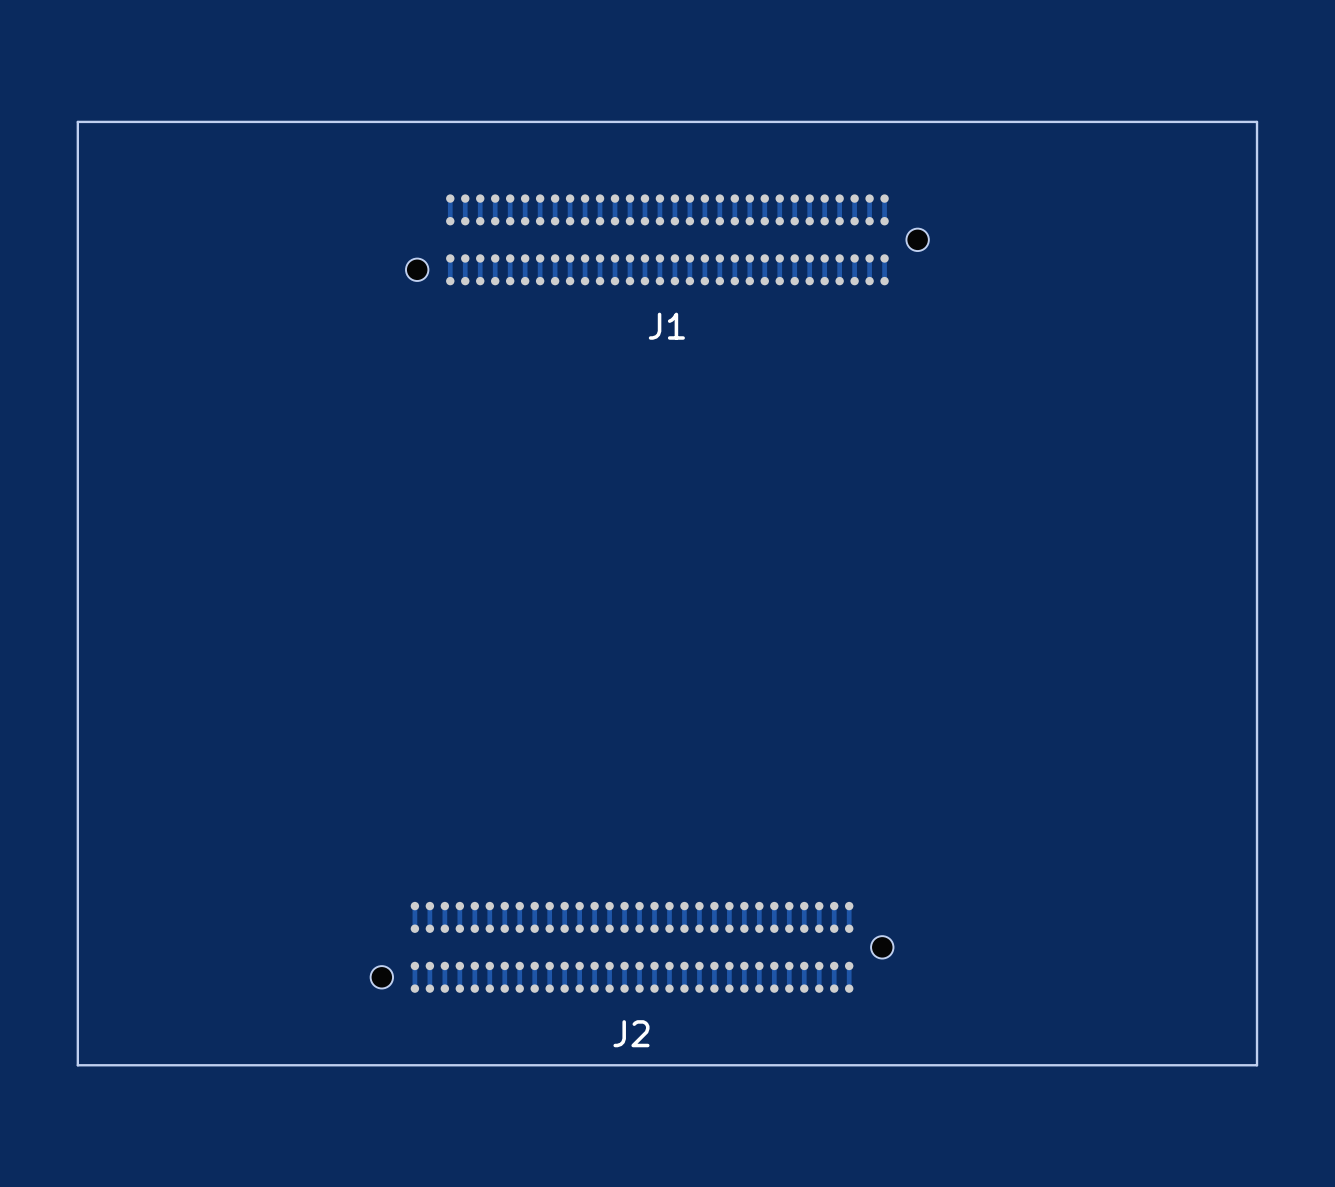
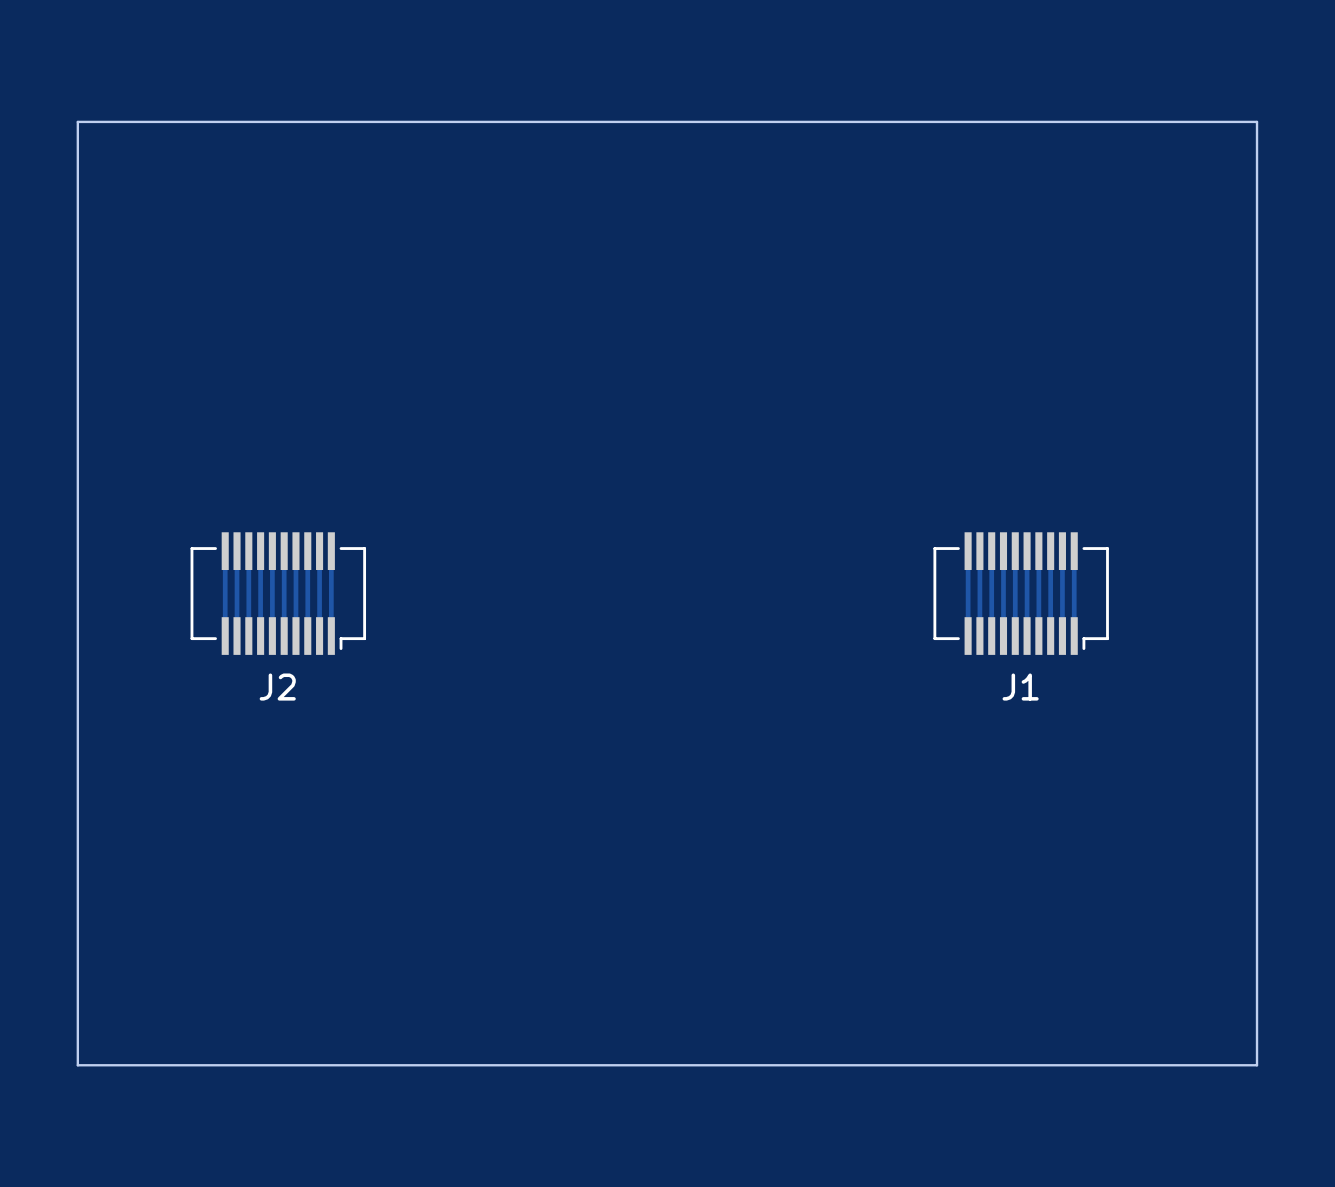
J1 footprint: [405, 194, 929, 286] -> [933, 532, 1109, 655]
track: (450, 198) (450, 221) -> none
track: (465, 198) (465, 221) -> none
track: (480, 198) (480, 221) -> none
track: (495, 198) (495, 221) -> none
track: (510, 198) (510, 221) -> none
track: (525, 198) (525, 221) -> none
track: (540, 198) (540, 221) -> none
track: (555, 198) (555, 221) -> none
track: (570, 198) (570, 221) -> none
track: (585, 198) (585, 221) -> none
track: (600, 198) (600, 221) -> none
track: (615, 198) (615, 221) -> none
track: (629, 198) (629, 221) -> none
track: (644, 198) (644, 221) -> none
track: (659, 198) (659, 221) -> none
track: (674, 198) (674, 221) -> none
track: (689, 198) (689, 221) -> none
track: (704, 198) (704, 221) -> none
track: (719, 198) (719, 221) -> none
track: (734, 198) (734, 221) -> none
track: (749, 198) (749, 221) -> none
track: (764, 198) (764, 221) -> none
track: (779, 198) (779, 221) -> none
track: (794, 198) (794, 221) -> none
track: (809, 198) (809, 221) -> none
track: (824, 198) (824, 221) -> none
track: (839, 198) (839, 221) -> none
track: (854, 198) (854, 221) -> none
track: (869, 198) (869, 221) -> none
track: (884, 198) (884, 221) -> none
track: (450, 258) (450, 281) -> none
track: (465, 258) (465, 281) -> none
track: (480, 258) (480, 281) -> none
track: (495, 258) (495, 281) -> none
track: (510, 258) (510, 281) -> none
track: (525, 258) (525, 281) -> none
track: (540, 258) (540, 281) -> none
track: (555, 258) (555, 281) -> none
track: (570, 258) (570, 281) -> none
track: (585, 258) (585, 281) -> none
track: (600, 258) (600, 281) -> none
track: (615, 258) (615, 281) -> none
track: (629, 258) (629, 281) -> none
track: (644, 258) (644, 281) -> none
track: (659, 258) (659, 281) -> none
track: (674, 258) (674, 281) -> none
track: (689, 258) (689, 281) -> none
track: (704, 258) (704, 281) -> none
track: (719, 258) (719, 281) -> none
track: (734, 258) (734, 281) -> none
track: (749, 258) (749, 281) -> none
track: (764, 258) (764, 281) -> none
track: (779, 258) (779, 281) -> none
track: (794, 258) (794, 281) -> none
track: (809, 258) (809, 281) -> none
track: (824, 258) (824, 281) -> none
track: (839, 258) (839, 281) -> none
track: (854, 258) (854, 281) -> none
track: (869, 258) (869, 281) -> none
track: (884, 258) (884, 281) -> none
track: none -> (225, 551) (225, 636)
track: none -> (237, 551) (237, 636)
track: none -> (248, 551) (248, 636)
track: none -> (260, 551) (260, 636)
track: none -> (272, 551) (272, 636)
track: none -> (284, 551) (284, 636)
track: none -> (295, 551) (295, 636)
track: none -> (307, 551) (307, 636)
track: none -> (319, 551) (319, 636)
track: none -> (331, 551) (331, 636)
track: none -> (968, 551) (968, 636)
track: none -> (979, 551) (979, 636)
track: none -> (991, 551) (991, 636)
track: none -> (1003, 551) (1003, 636)
track: none -> (1015, 551) (1015, 636)
track: none -> (1027, 551) (1027, 636)
track: none -> (1038, 551) (1038, 636)
track: none -> (1050, 551) (1050, 636)
track: none -> (1062, 551) (1062, 636)
track: none -> (1074, 551) (1074, 636)
J2 footprint: [370, 901, 894, 993] -> [190, 532, 367, 655]
track: (414, 906) (414, 928) -> none
track: (429, 906) (429, 928) -> none
track: (444, 906) (444, 928) -> none
track: (459, 906) (459, 928) -> none
track: (474, 906) (474, 928) -> none
track: (489, 906) (489, 928) -> none
track: (504, 906) (504, 928) -> none
track: (519, 906) (519, 928) -> none
track: (534, 906) (534, 928) -> none
track: (549, 906) (549, 928) -> none
track: (564, 906) (564, 928) -> none
track: (579, 906) (579, 928) -> none
track: (594, 906) (594, 928) -> none
track: (609, 906) (609, 928) -> none
track: (624, 906) (624, 928) -> none
track: (639, 906) (639, 928) -> none
track: (654, 906) (654, 928) -> none
track: (669, 906) (669, 928) -> none
track: (684, 906) (684, 928) -> none
track: (699, 906) (699, 928) -> none
track: (714, 906) (714, 928) -> none
track: (729, 906) (729, 928) -> none
track: (744, 906) (744, 928) -> none
track: (759, 906) (759, 928) -> none
track: (774, 906) (774, 928) -> none
track: (789, 906) (789, 928) -> none
track: (804, 906) (804, 928) -> none
track: (819, 906) (819, 928) -> none
track: (834, 906) (834, 928) -> none
track: (849, 906) (849, 928) -> none
track: (414, 965) (414, 988) -> none
track: (429, 965) (429, 988) -> none
track: (444, 965) (444, 988) -> none
track: (459, 965) (459, 988) -> none
track: (474, 965) (474, 988) -> none
track: (489, 965) (489, 988) -> none
track: (504, 965) (504, 988) -> none
track: (519, 965) (519, 988) -> none
track: (534, 965) (534, 988) -> none
track: (549, 965) (549, 988) -> none
track: (564, 965) (564, 988) -> none
track: (579, 965) (579, 988) -> none
track: (594, 965) (594, 988) -> none
track: (609, 965) (609, 988) -> none
track: (624, 965) (624, 988) -> none
track: (639, 965) (639, 988) -> none
track: (654, 965) (654, 988) -> none
track: (669, 965) (669, 988) -> none
track: (684, 965) (684, 988) -> none
track: (699, 965) (699, 988) -> none
track: (714, 965) (714, 988) -> none
track: (729, 965) (729, 988) -> none
track: (744, 965) (744, 988) -> none
track: (759, 965) (759, 988) -> none
track: (774, 965) (774, 988) -> none
track: (789, 965) (789, 988) -> none
track: (804, 965) (804, 988) -> none
track: (819, 965) (819, 988) -> none
track: (834, 965) (834, 988) -> none
track: (849, 965) (849, 988) -> none

